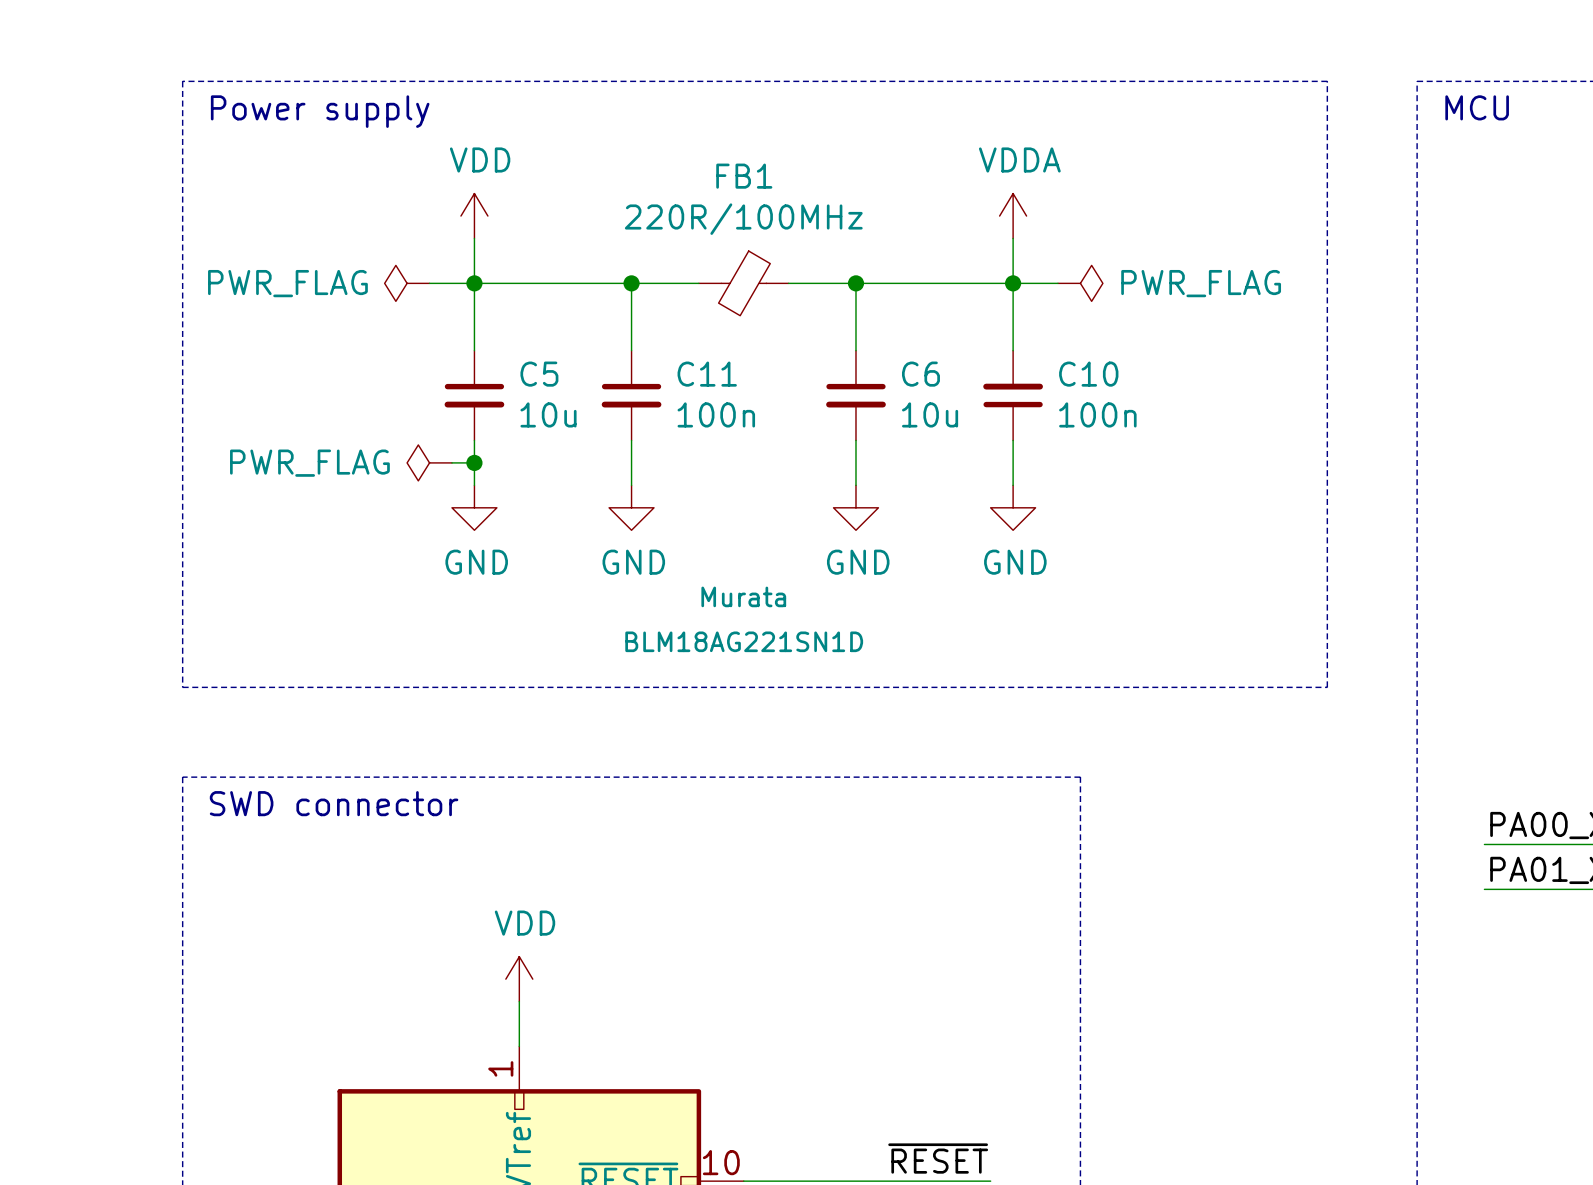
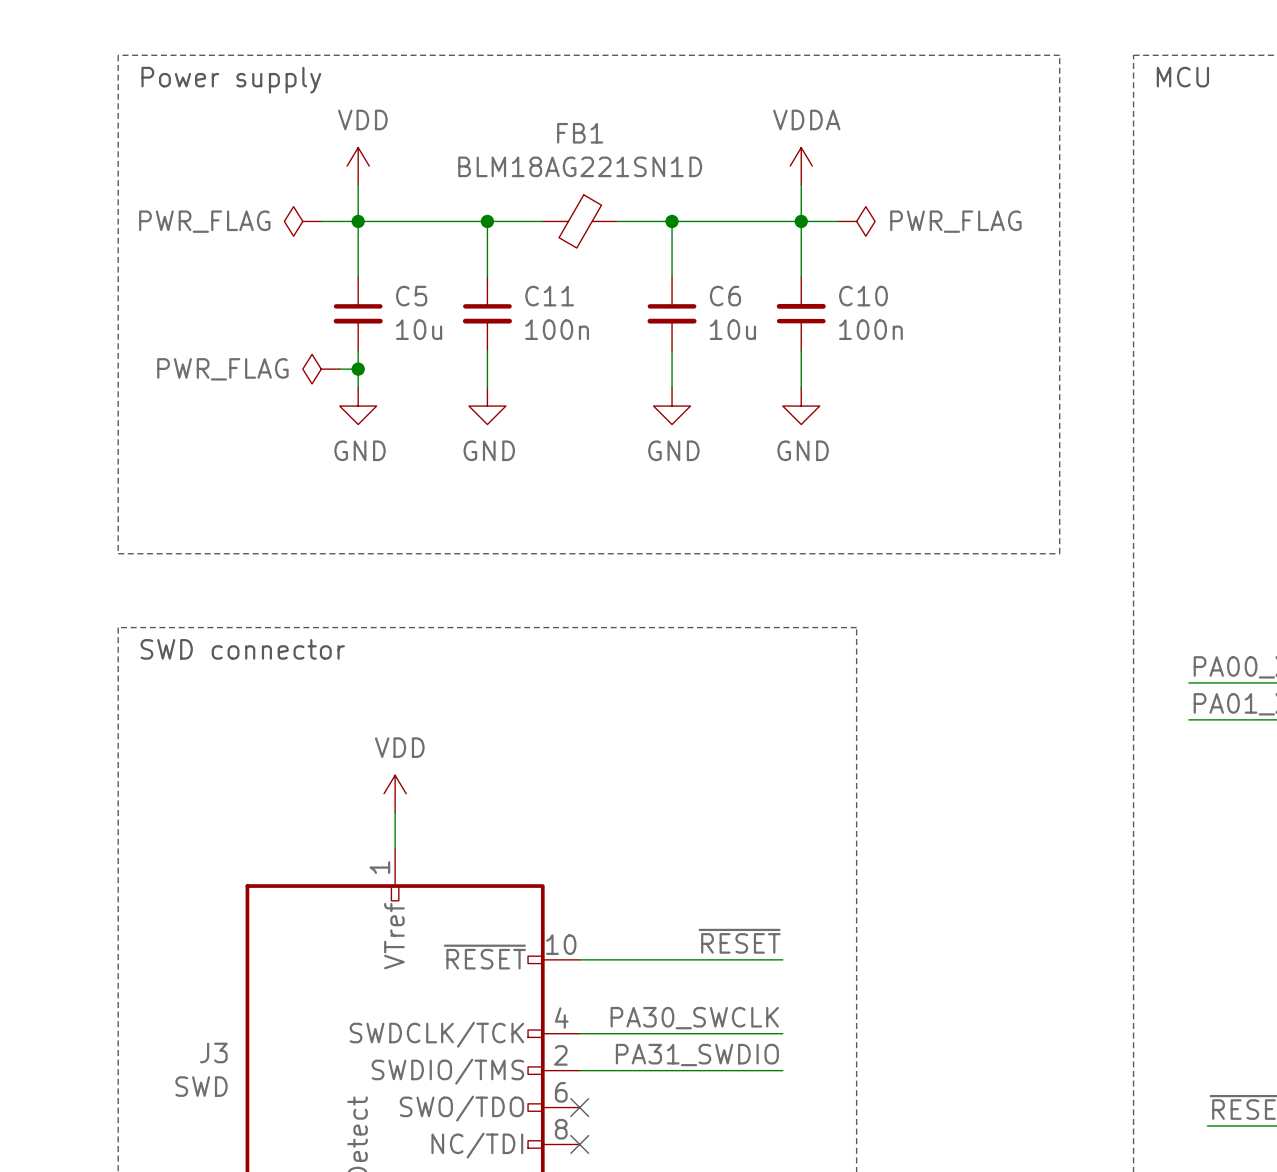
FB1 value: 220R/100MHz (743, 219) -> BLM18AG221SN1D (580, 166)
FB1 text: Murata (743, 596) -> none
FB1 text: BLM18AG221SN1D (744, 641) -> none

